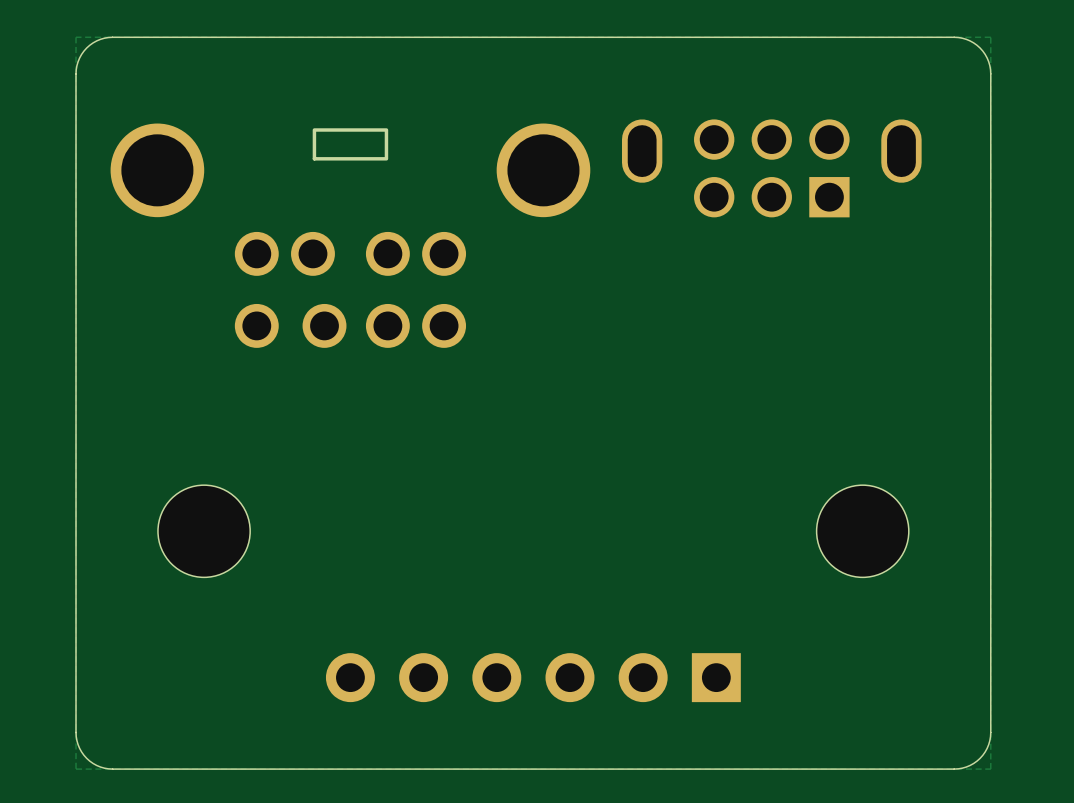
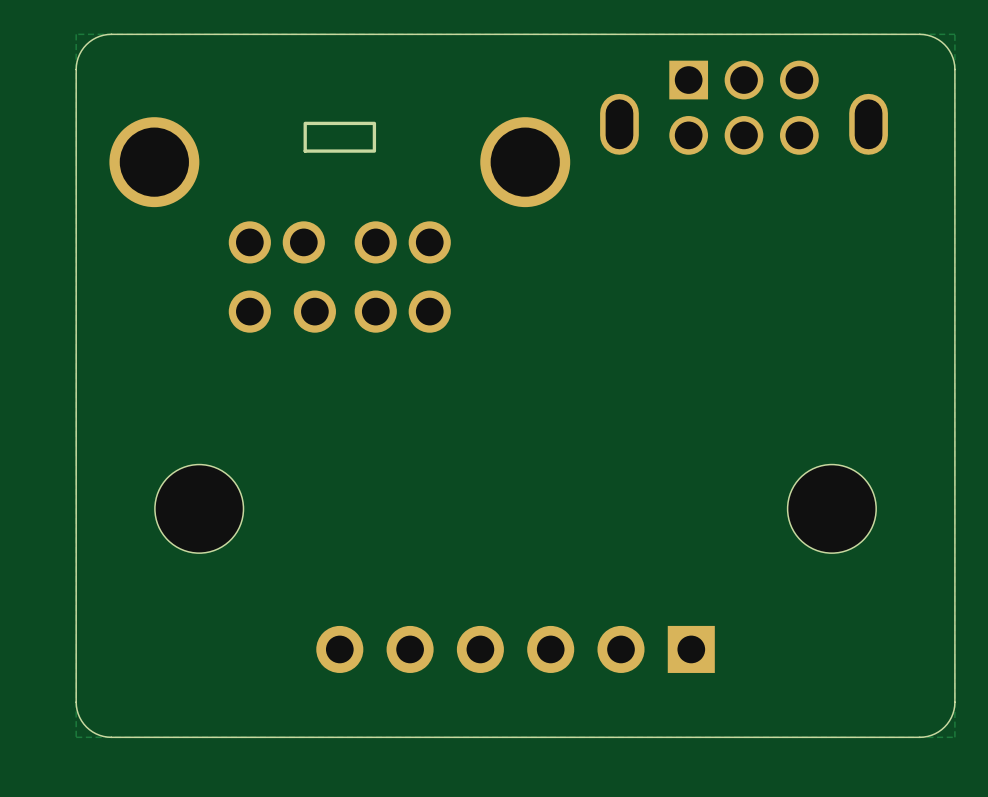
part rotation: 0° (771, 168) -> 180° (744, 107)

